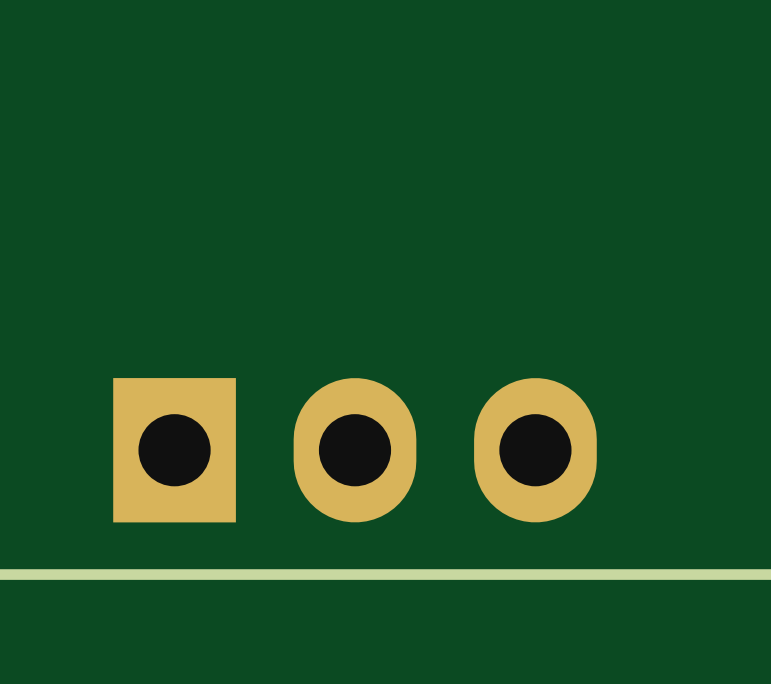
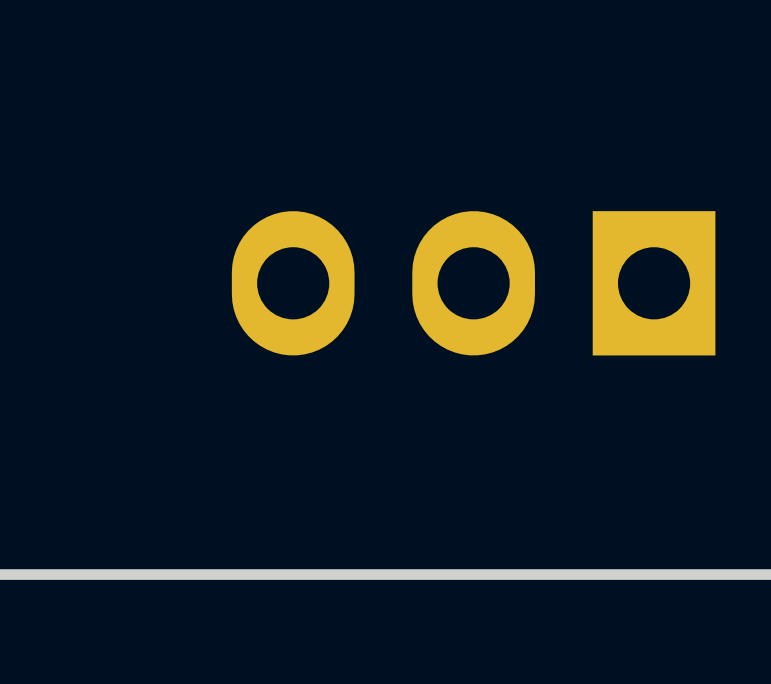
part rotation: 0° (354, 450) -> 180° (473, 283)

